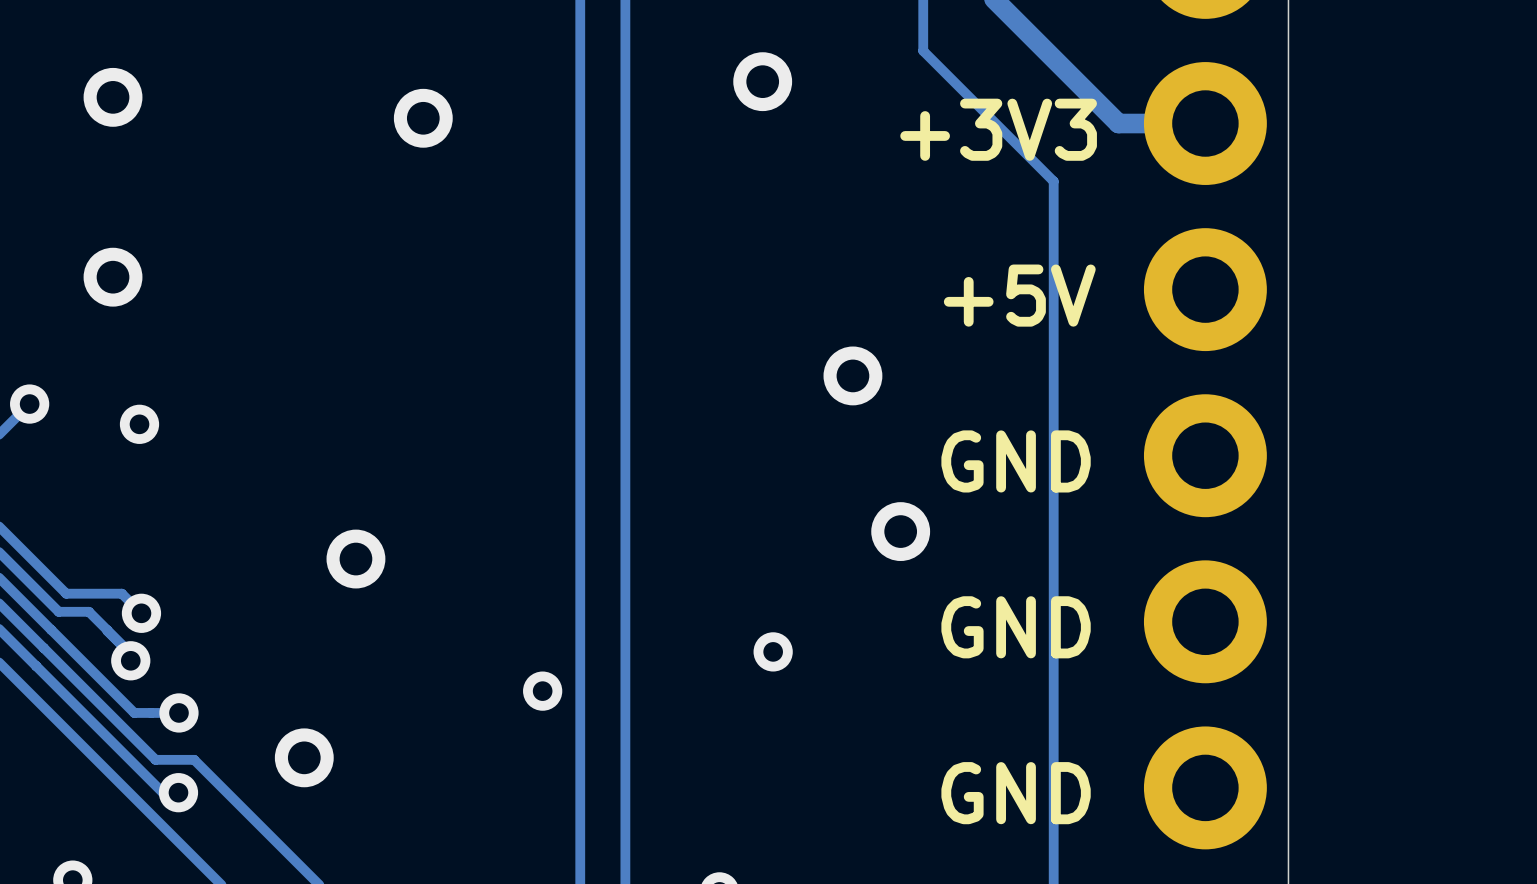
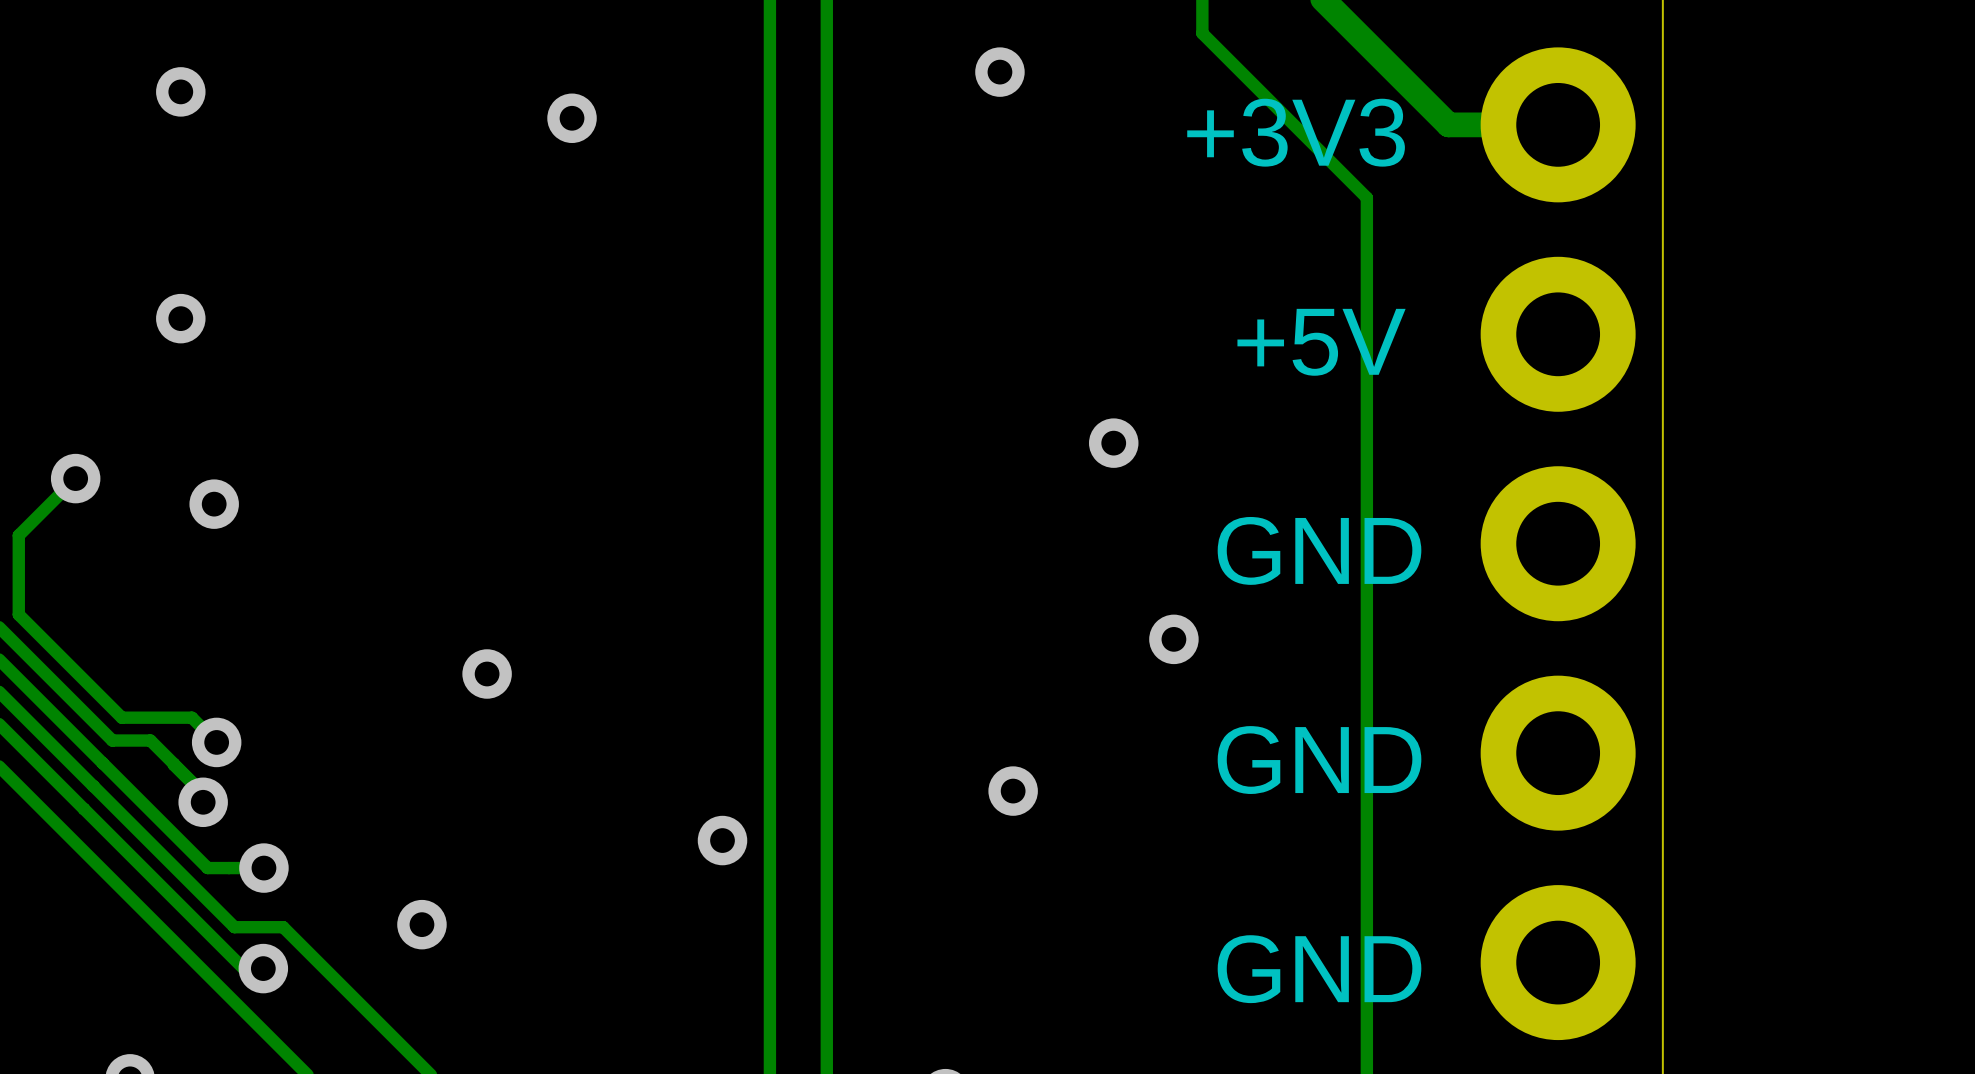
via size: [733, 52, 793, 112] -> [975, 47, 1025, 97]
via size: [83, 67, 143, 127] -> [156, 67, 206, 117]
via size: [393, 88, 453, 148] -> [547, 93, 597, 144]
via size: [83, 247, 143, 307] -> [156, 293, 206, 344]
via size: [823, 346, 883, 406] -> [1089, 418, 1139, 468]
via size: [871, 502, 931, 562] -> [1149, 614, 1199, 665]
via size: [326, 529, 386, 589] -> [462, 649, 512, 699]
via size: [274, 728, 334, 788] -> [397, 899, 447, 950]

